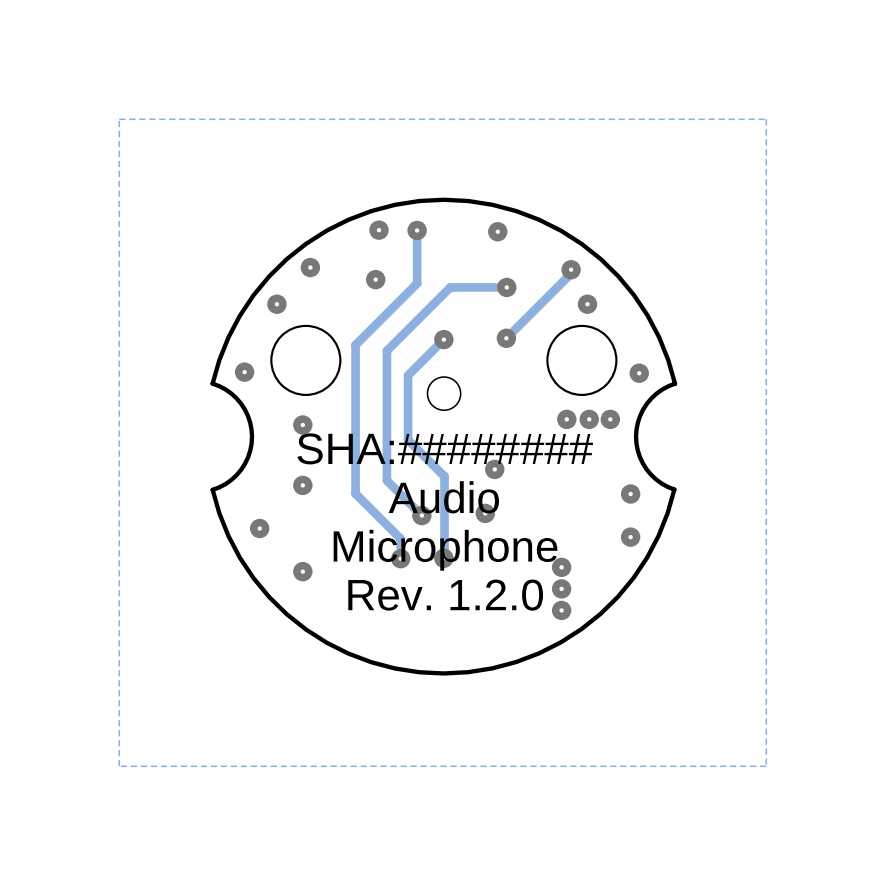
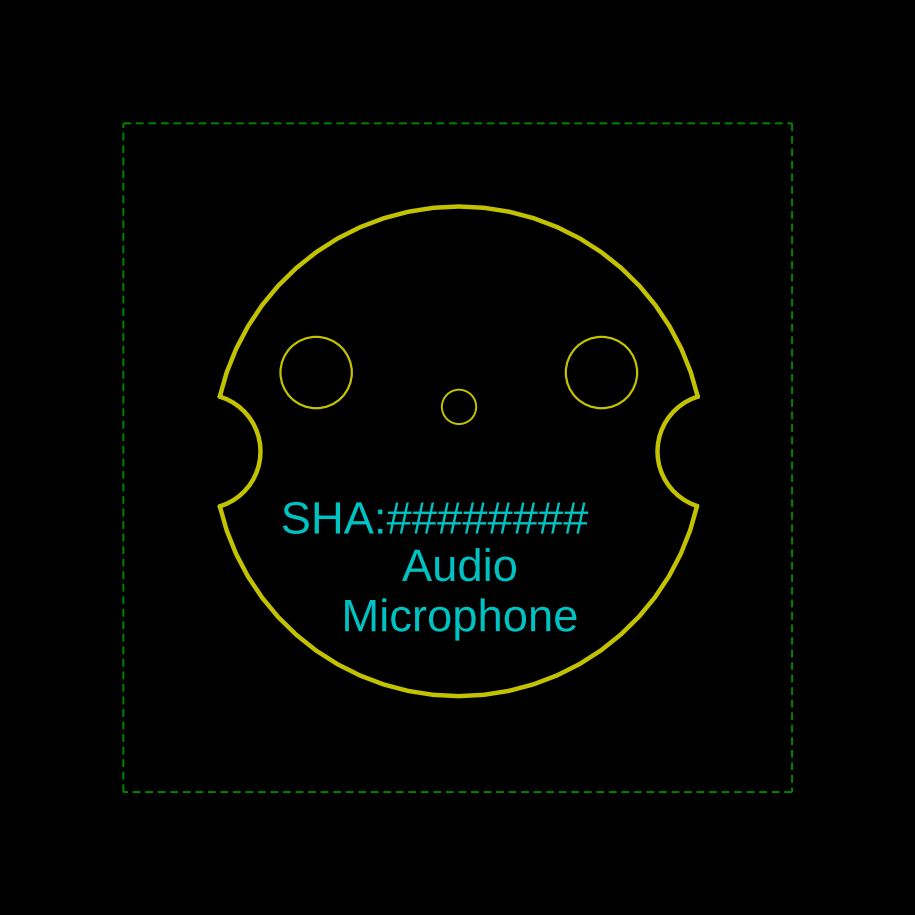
via: (379, 230) -> none
track: (417, 230) (417, 283) (355, 345) (355, 493) (400, 538) (400, 558) -> none
via: (417, 230) -> none
via: (497, 231) -> none
via: (310, 267) -> none
track: (571, 269) (571, 273) (506, 338) -> none
via: (571, 269) -> none
via: (375, 279) -> none
track: (506, 287) (450, 287) (386, 350) (386, 480) (421, 515) -> none
via: (506, 287) -> none
via: (276, 304) -> none
via: (587, 304) -> none
via: (506, 338) -> none
track: (443, 339) (408, 375) (408, 440) (444, 476) (443, 558) -> none
via: (443, 339) -> none
via: (244, 372) -> none
via: (639, 373) -> none
via: (566, 419) -> none
via: (589, 419) -> none
via: (610, 419) -> none
via: (302, 424) -> none
text position: SHA:######## (445, 448) -> SHA:######## (435, 517)
via: (494, 469) -> none
via: (302, 485) -> none
via: (630, 494) -> none
text: Audio (443, 497) -> none
via: (485, 513) -> none
via: (421, 515) -> none
via: (259, 528) -> none
via: (630, 537) -> none
text: Microphone (445, 550) -> Audio (459, 564)
via: (400, 558) -> none
via: (443, 558) -> none
via: (561, 567) -> none
via: (302, 571) -> none
via: (561, 588) -> none
text: Rev. 1.2.0 (445, 595) -> Microphone (460, 619)
via: (561, 610) -> none

